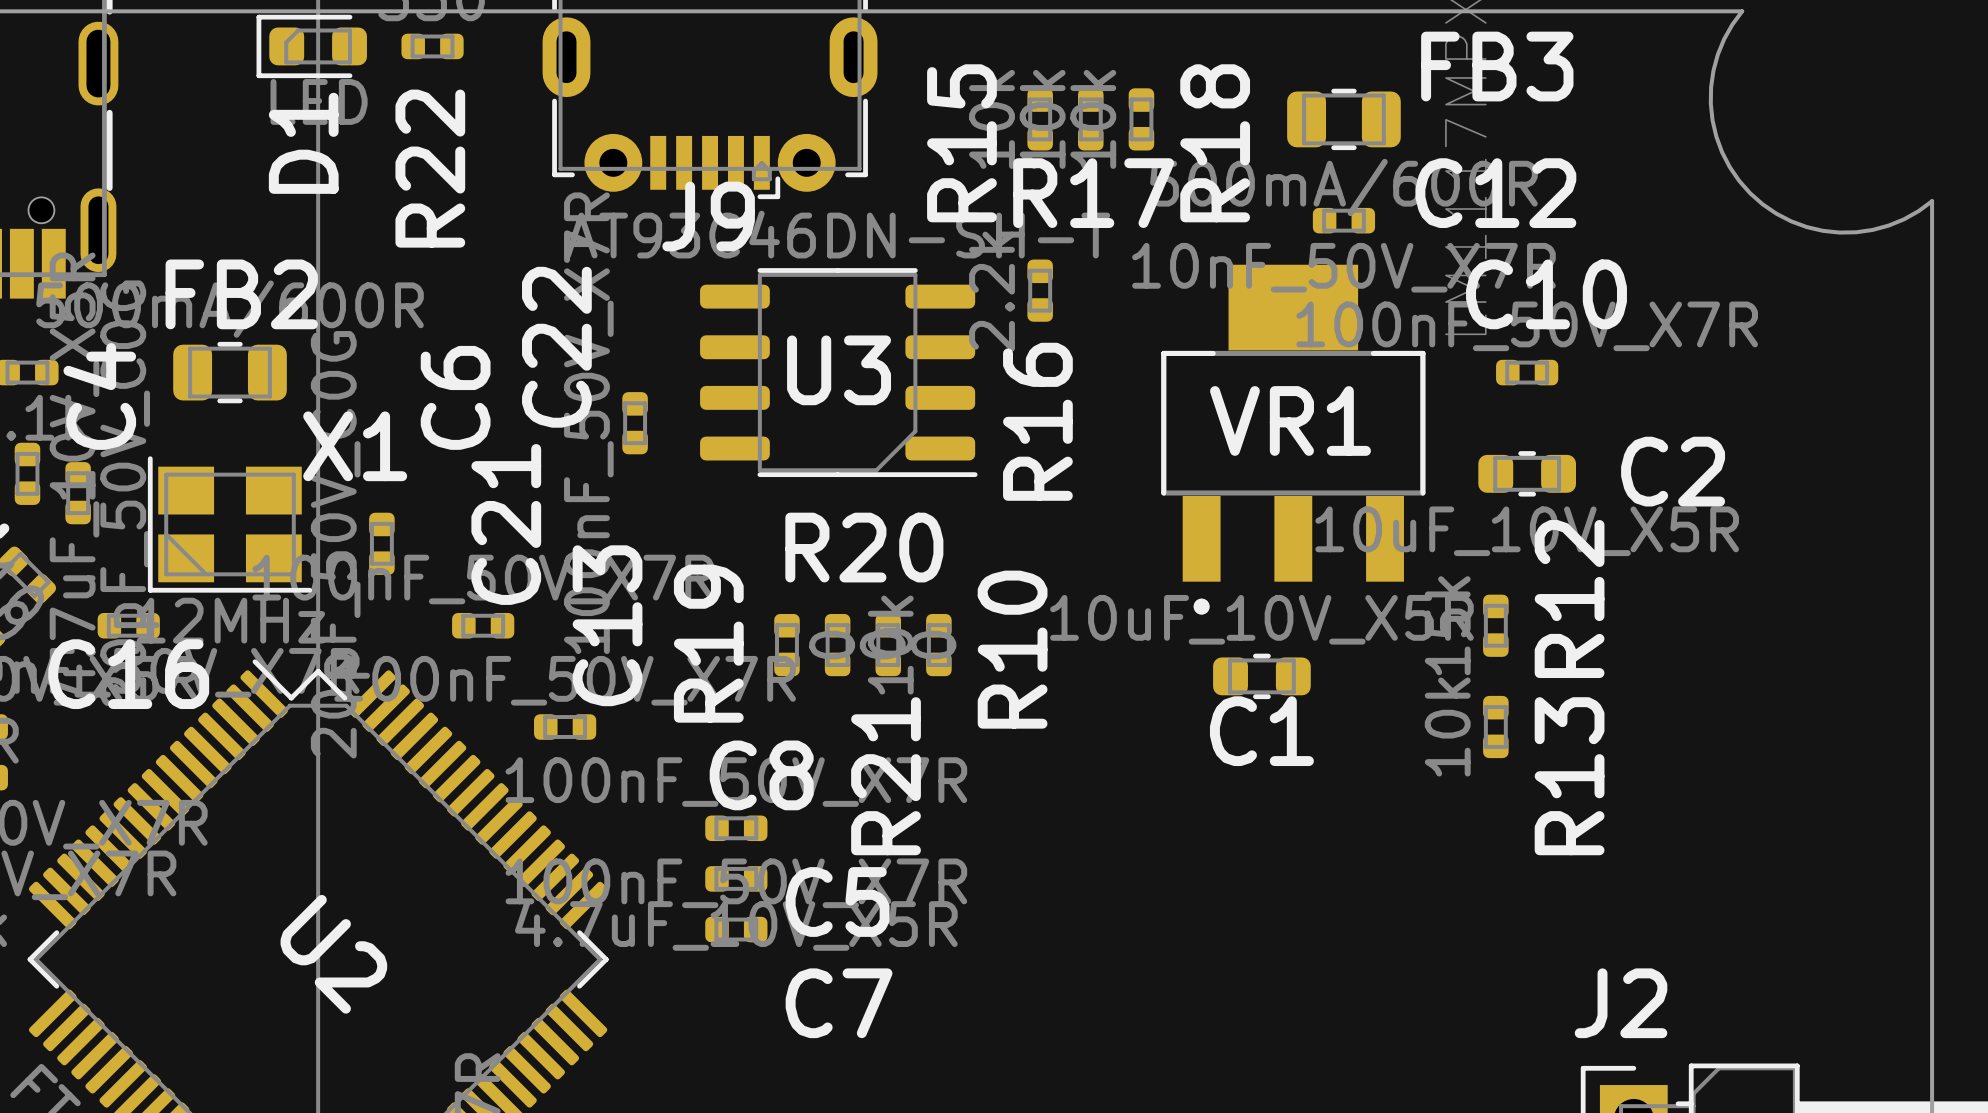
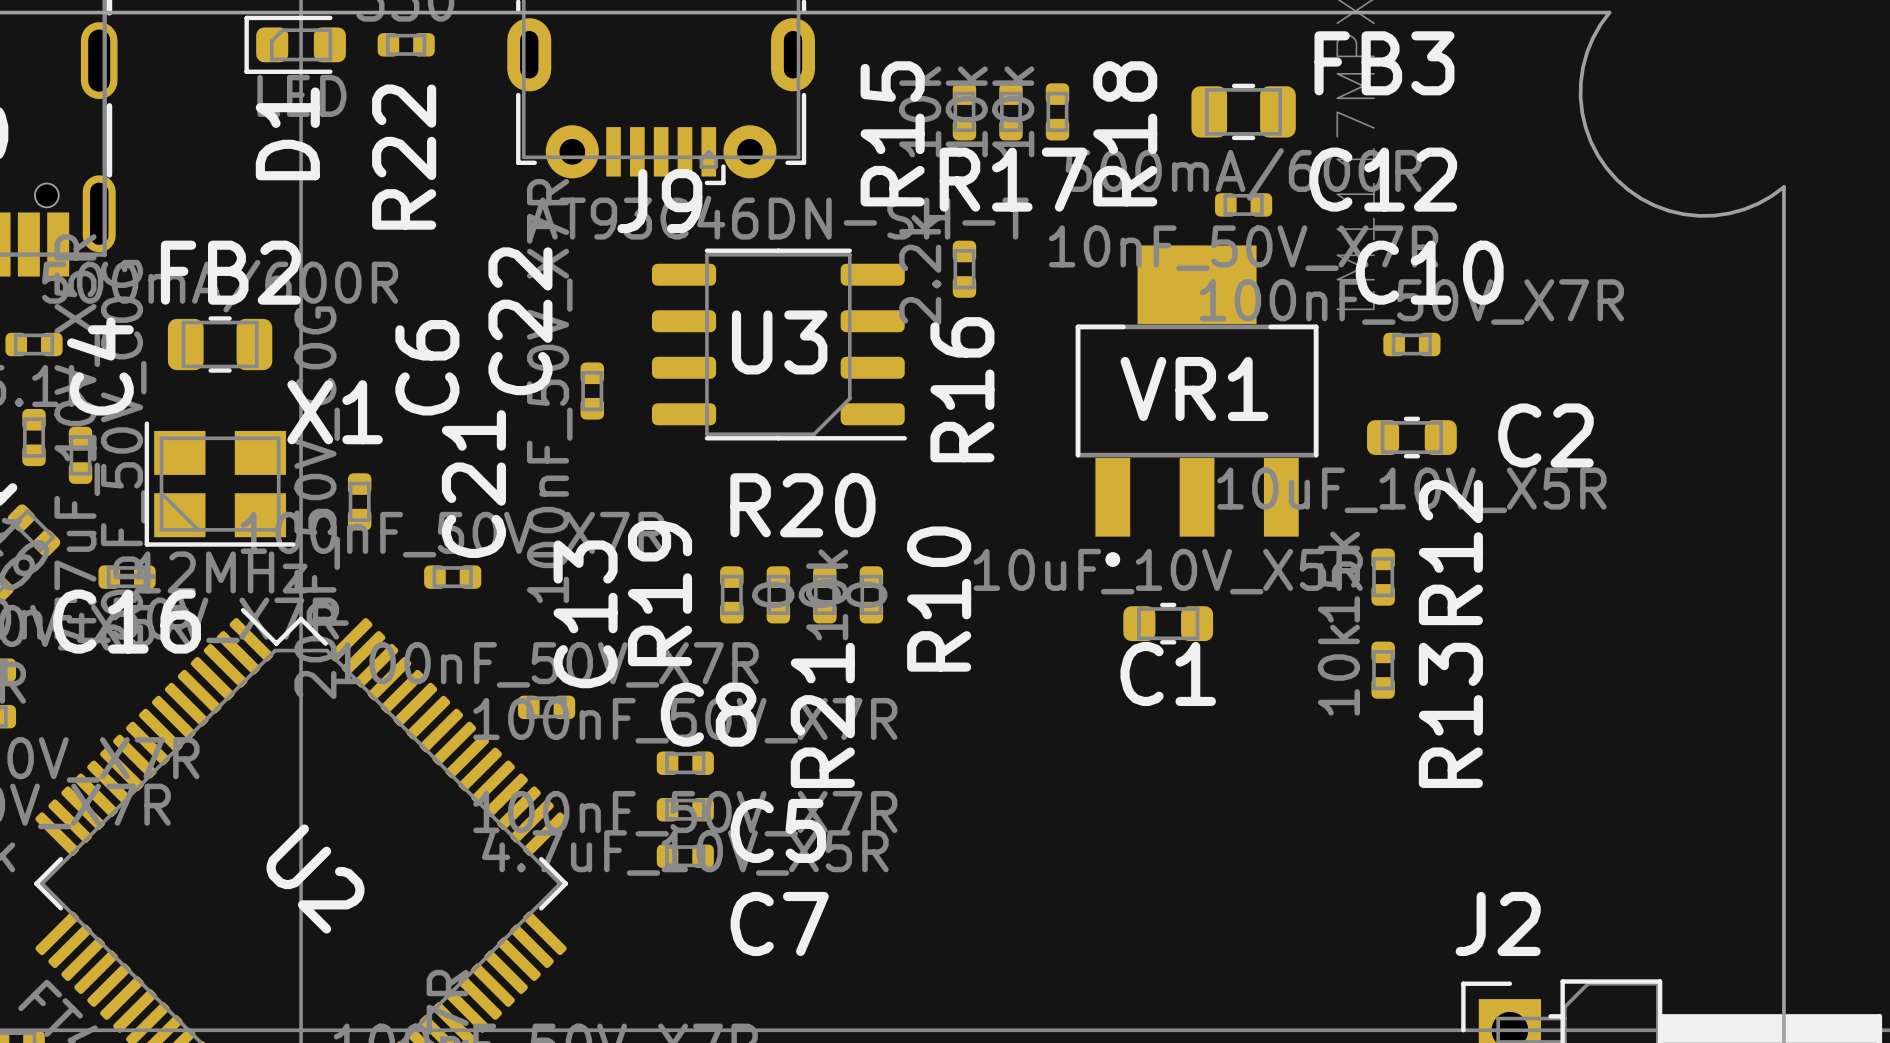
C13 position: (565, 727) -> (546, 707)

